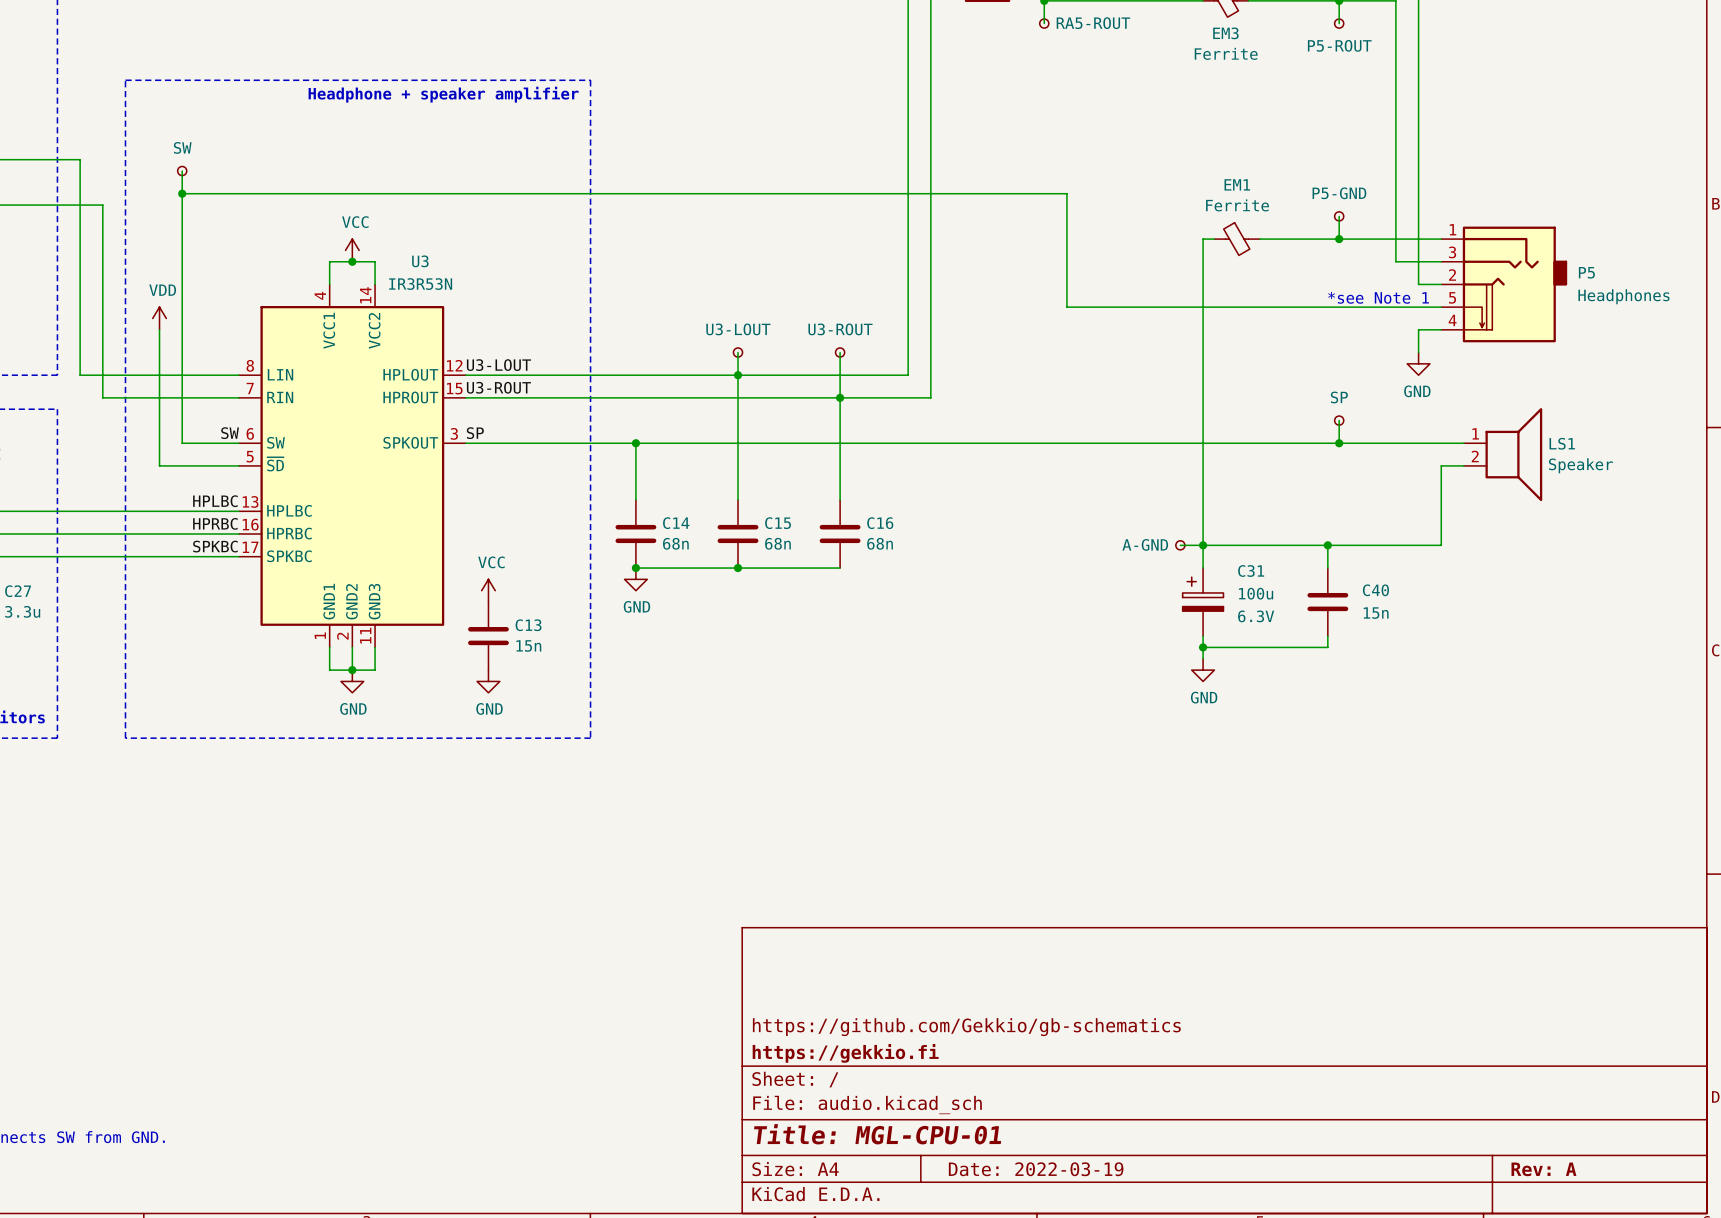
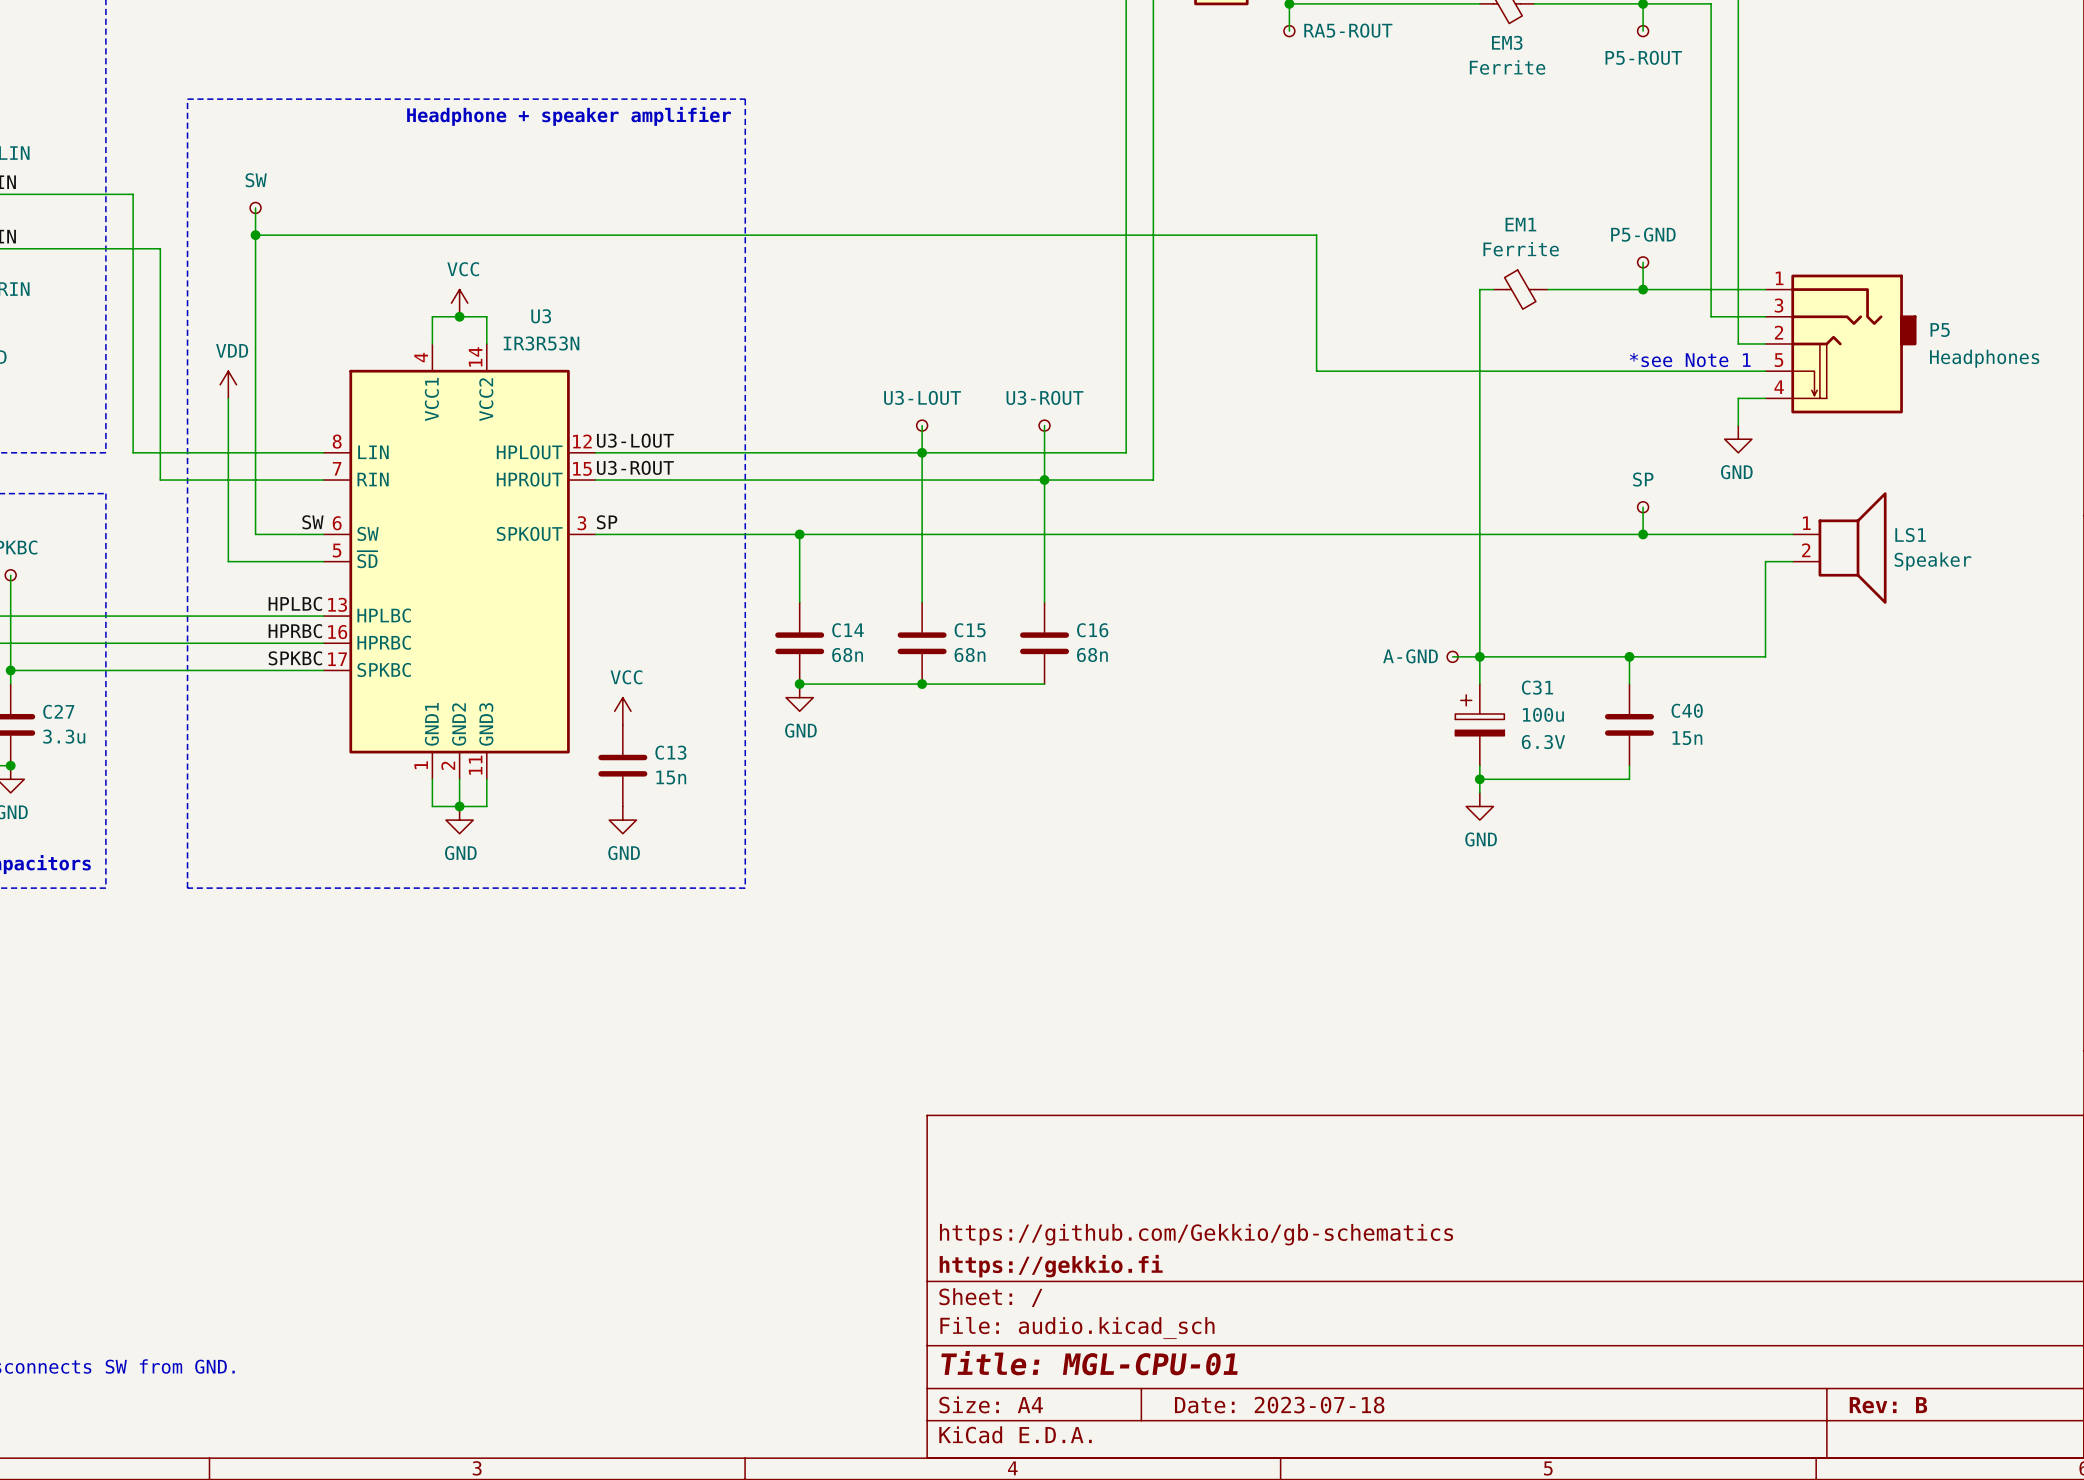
title block: Date: 2022-03-19 (1036, 1169) -> Date: 2023-07-18 (1279, 1405)
title block: Rev: A (1543, 1169) -> Rev: B (1888, 1405)

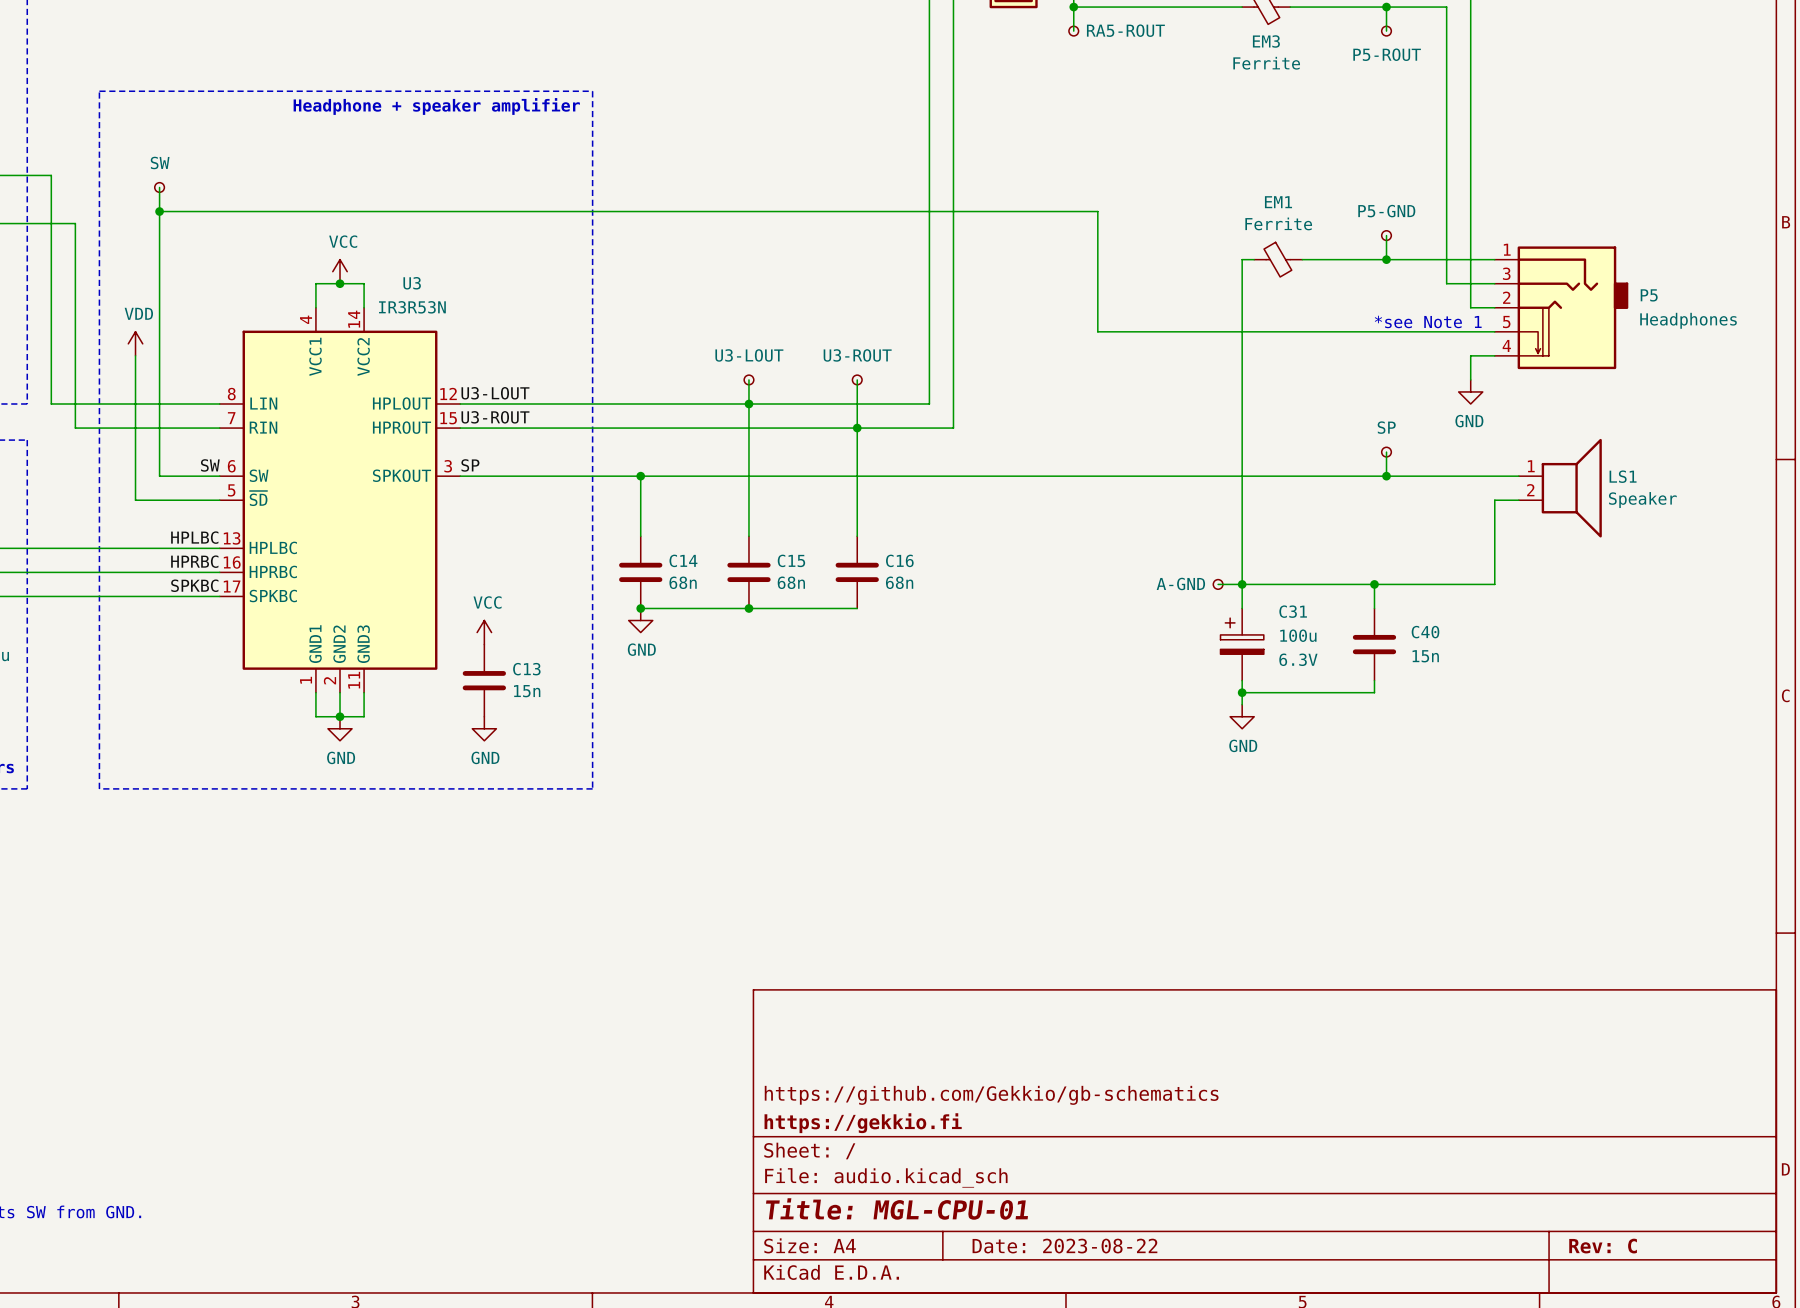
title block: Date: 2023-07-18 (1279, 1405) -> Date: 2023-08-22 (1064, 1246)
title block: Rev: B (1888, 1405) -> Rev: C (1603, 1246)

